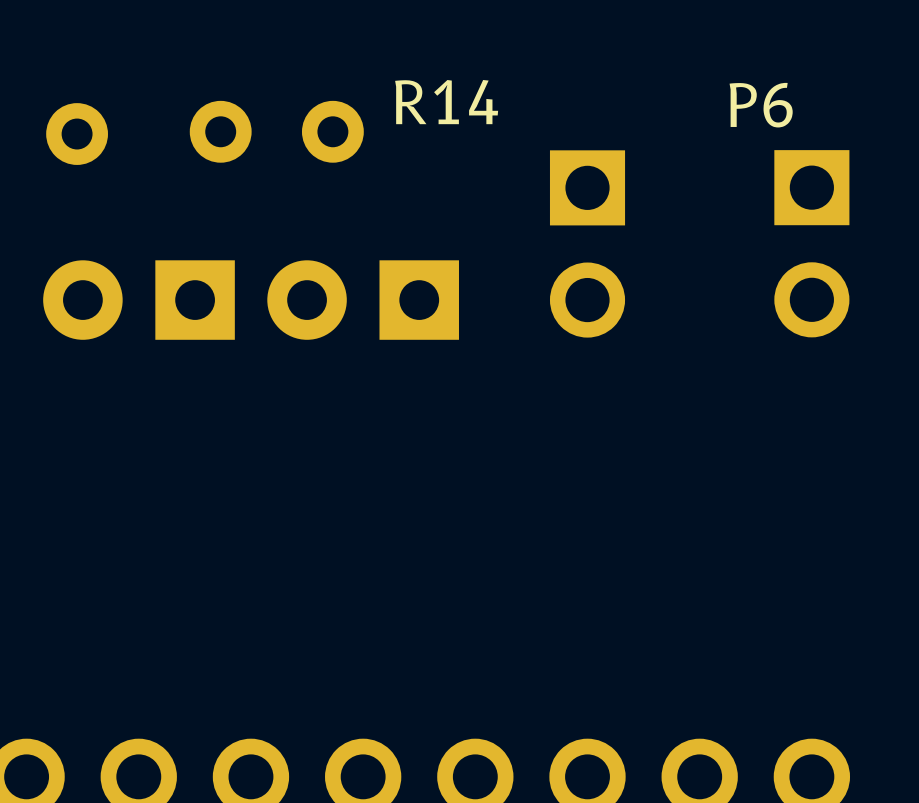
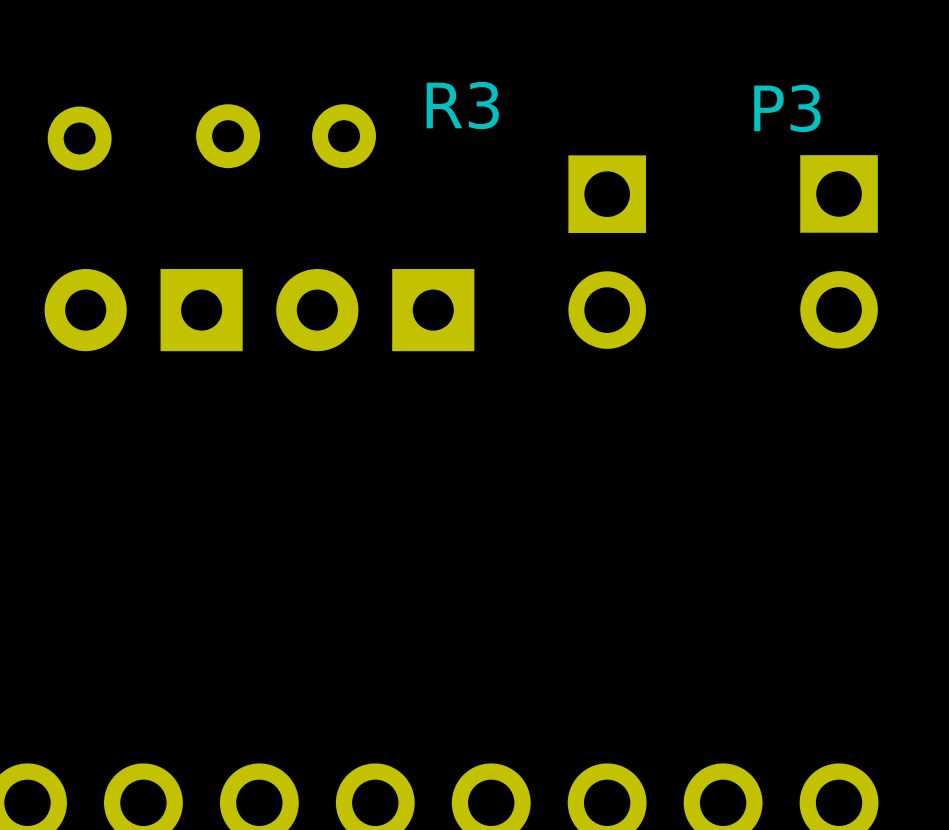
R14 name: R14 (446, 102) -> R3 (462, 105)
P6 name: P6 (761, 105) -> P3 (787, 108)

